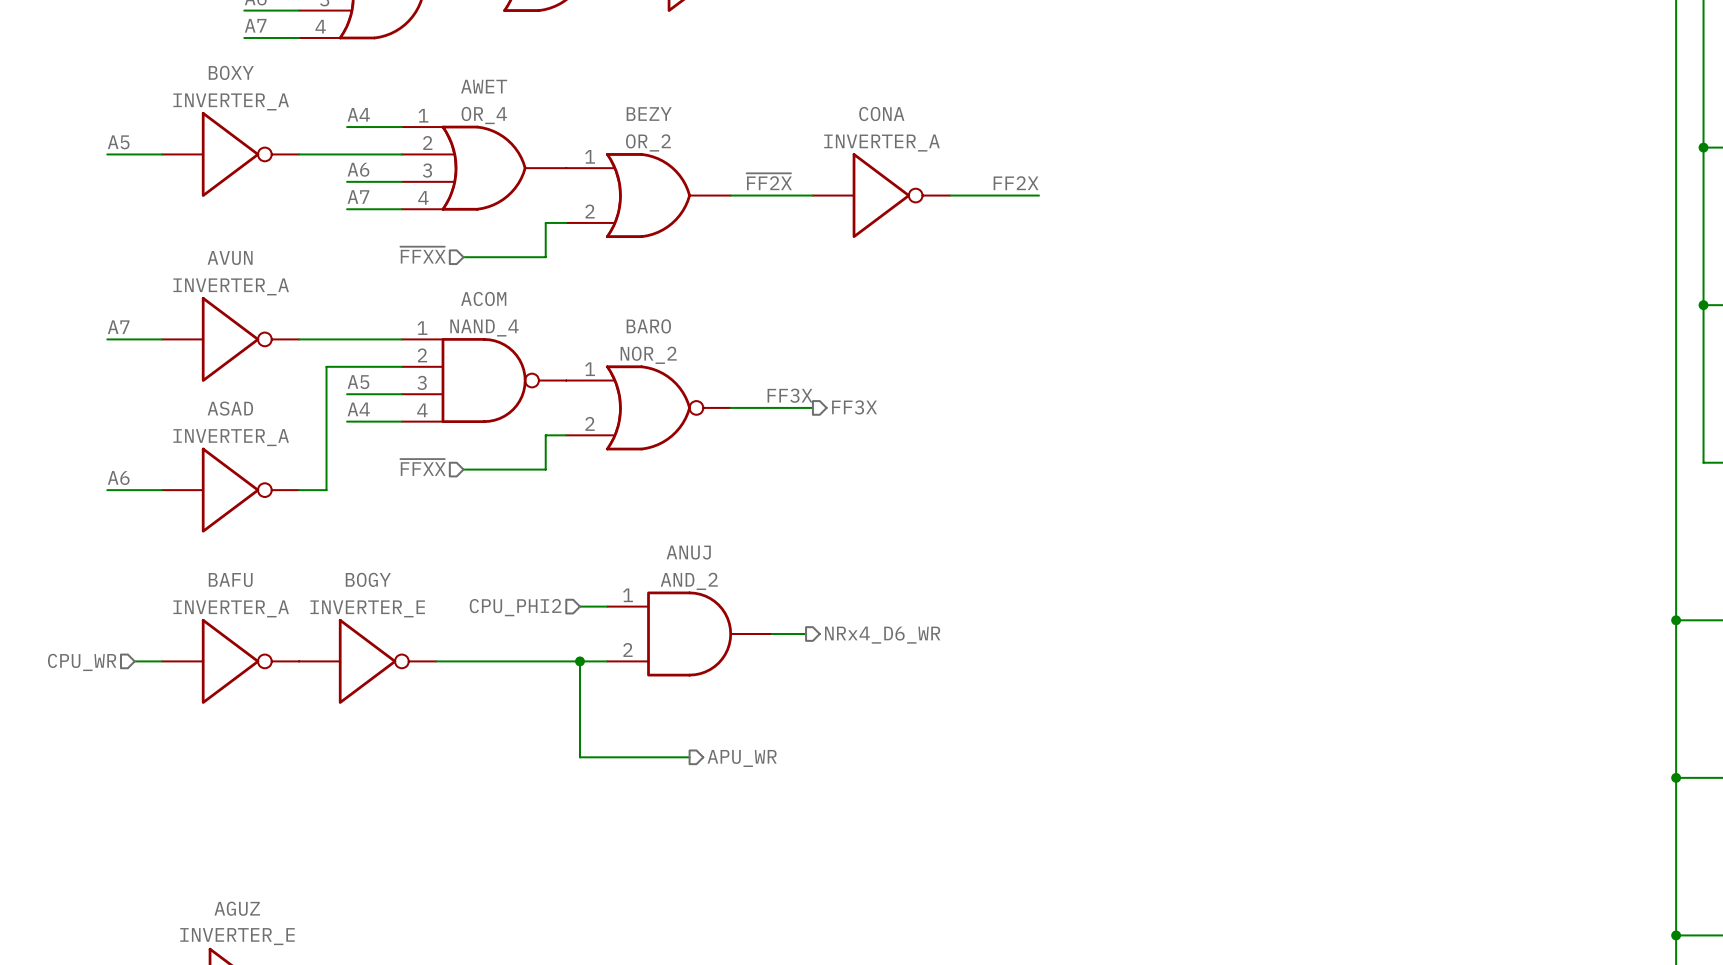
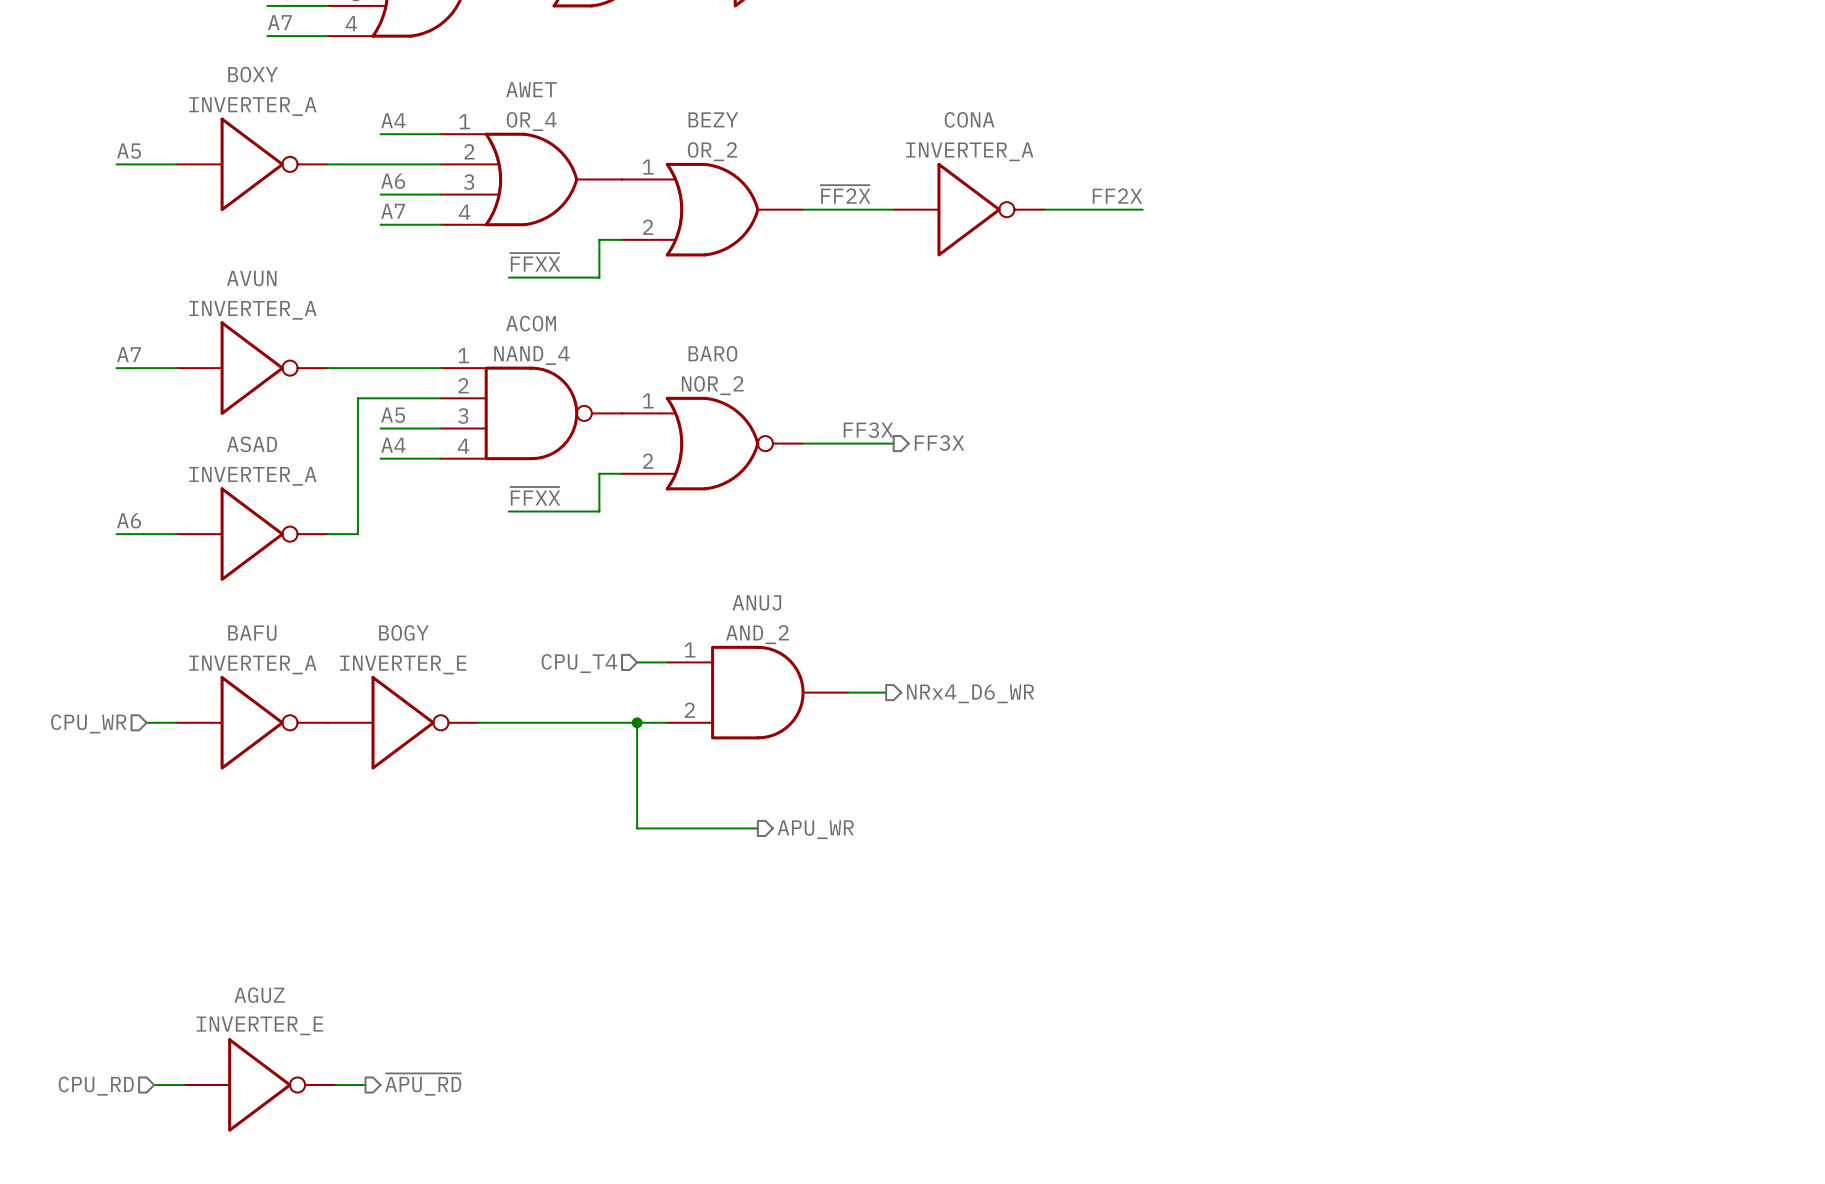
label: none -> ~{FFXX} (535, 262)
hierarchical label: ~{FFXX} (423, 255) -> none
label: none -> ~{FFXX} (535, 496)
hierarchical label: ~{FFXX} (423, 467) -> none
hierarchical label: CPU_PHI2 (515, 607) -> CPU_T4 (579, 663)

